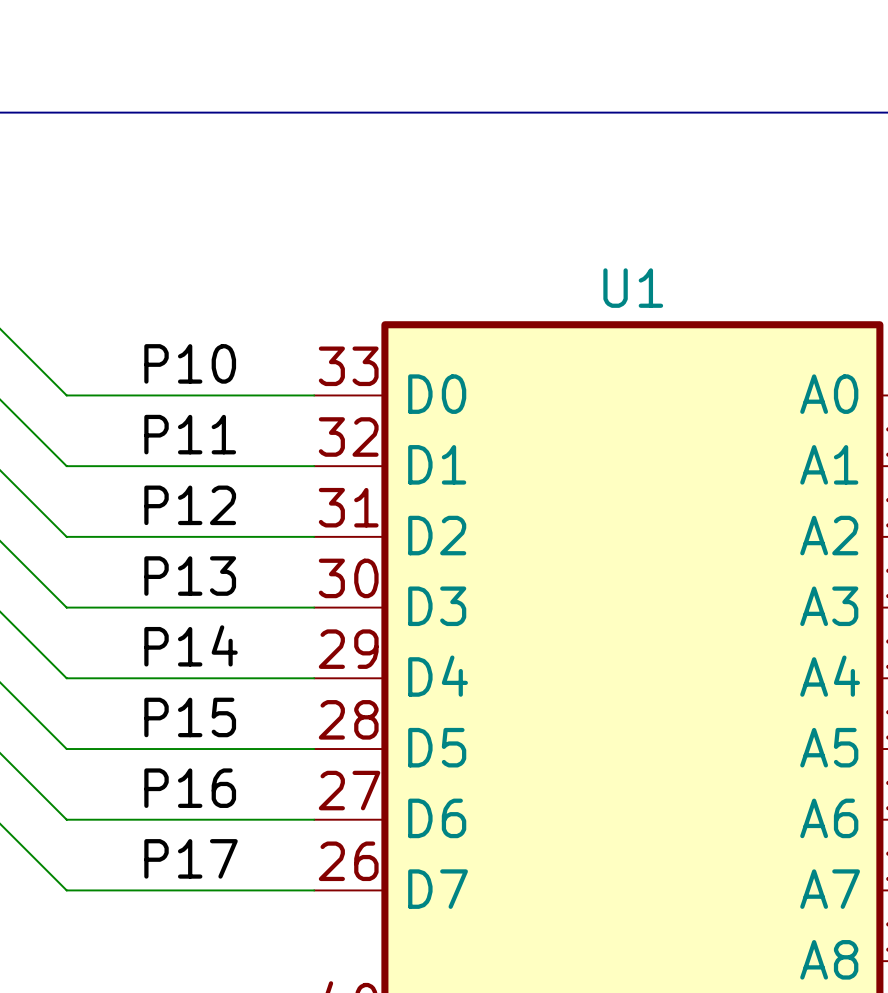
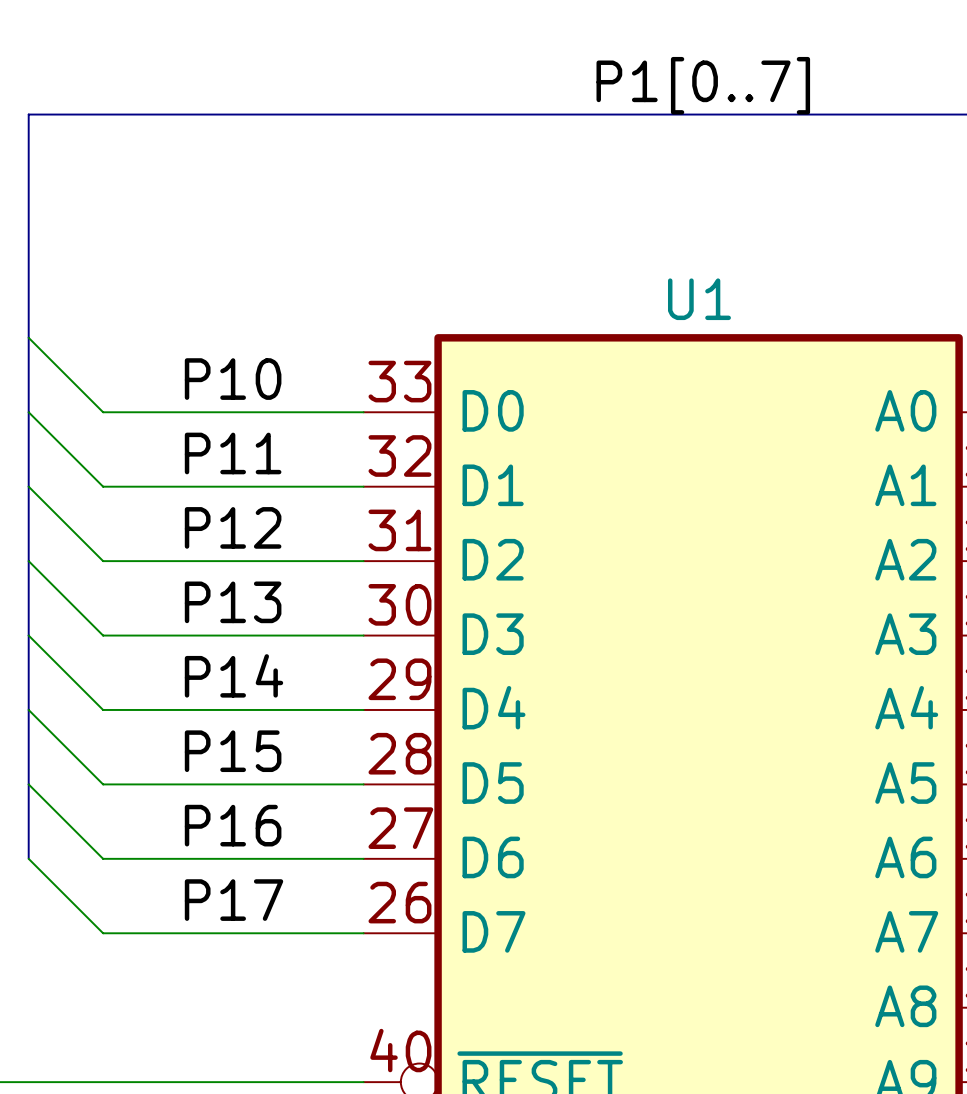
label: none -> P1[0..7] (703, 85)

